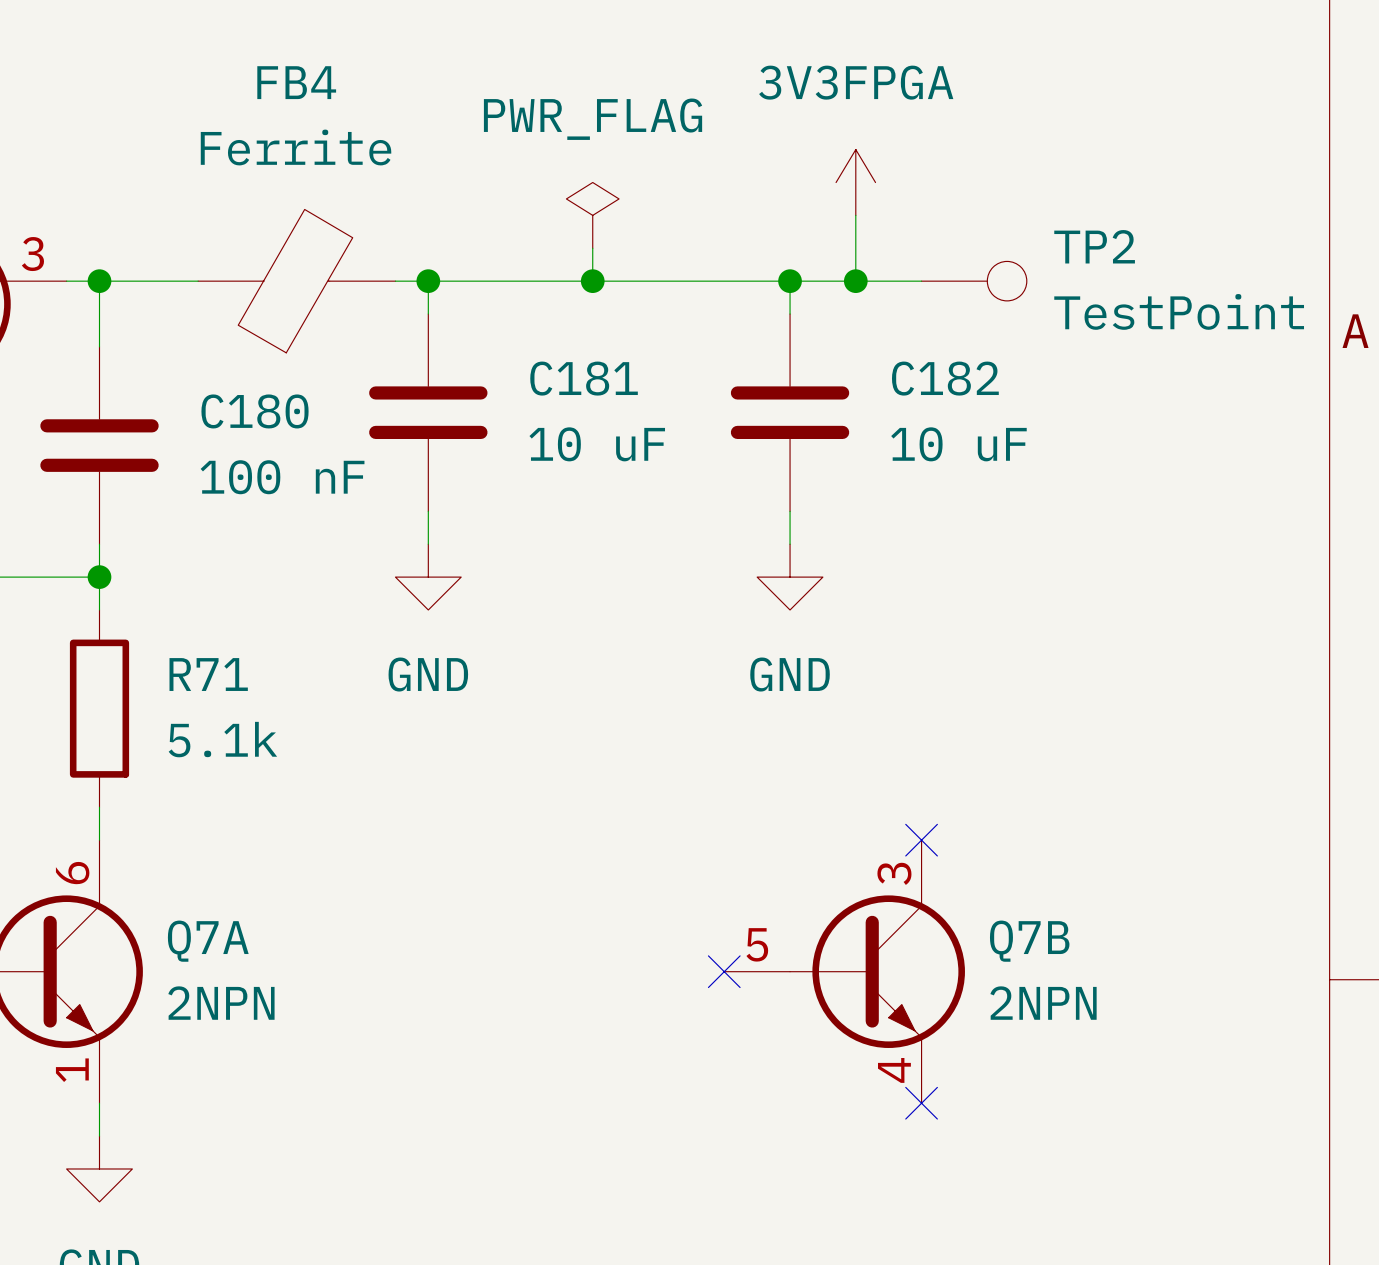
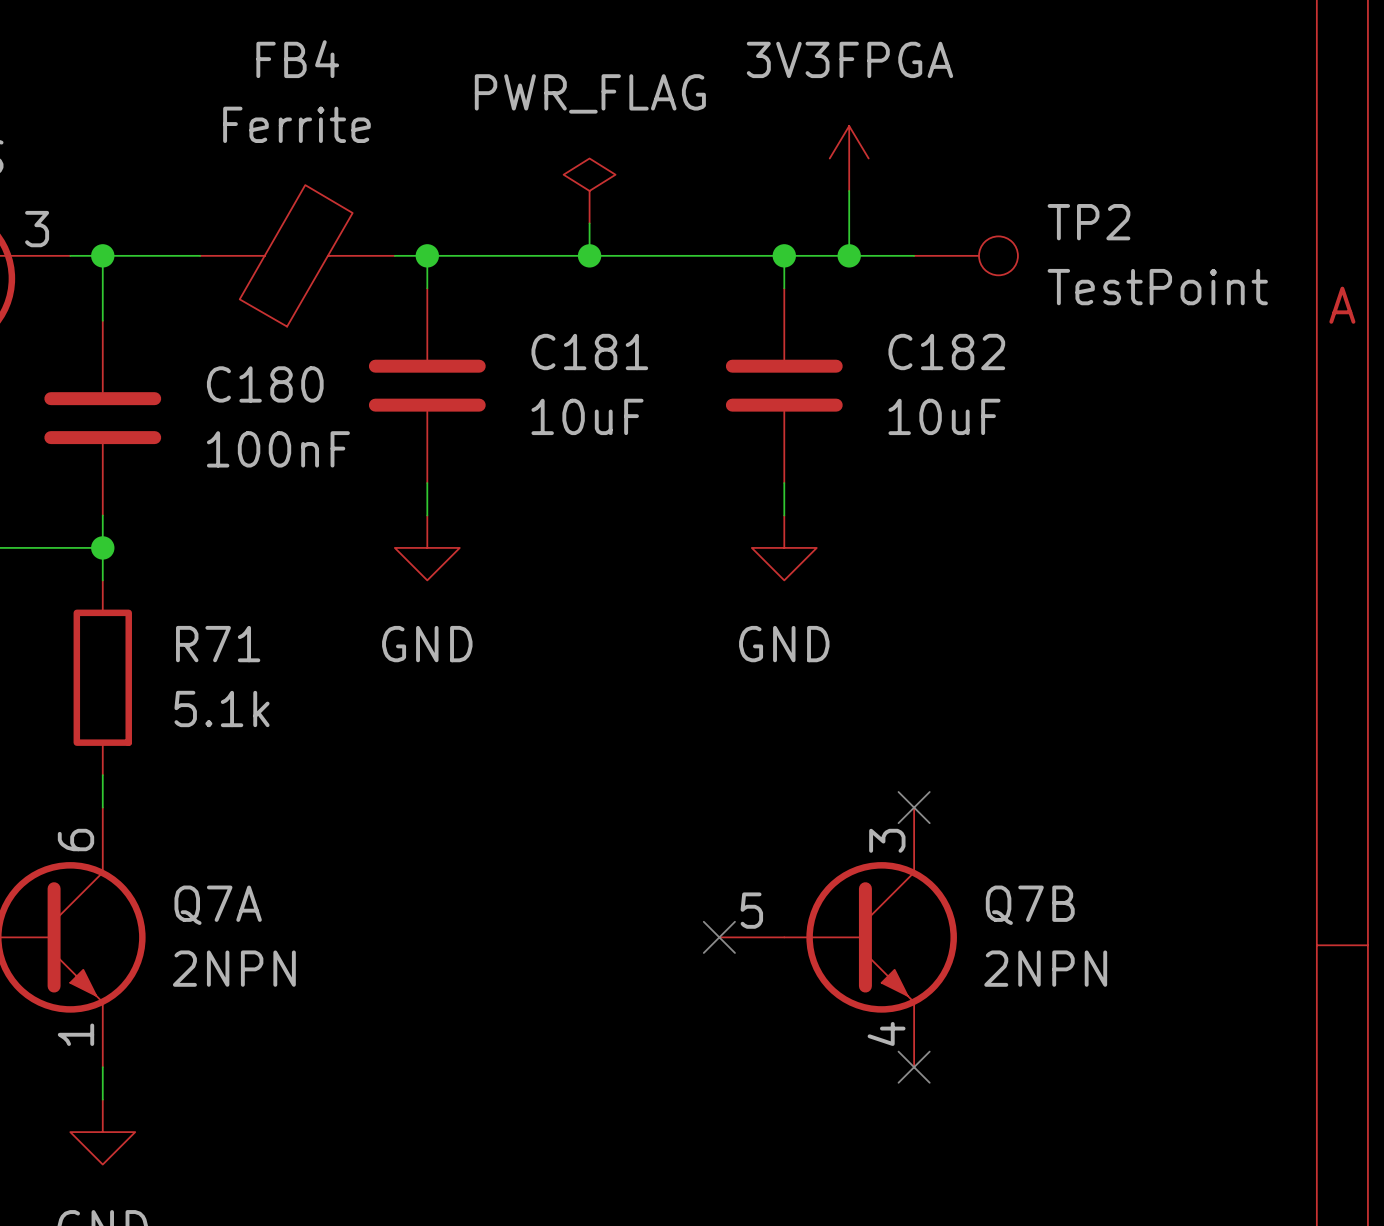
C181 value: 10 uF (597, 444) -> 10uF (587, 416)
C182 value: 10 uF (958, 444) -> 10uF (944, 416)
C180 value: 100 nF (282, 477) -> 100nF (278, 449)

